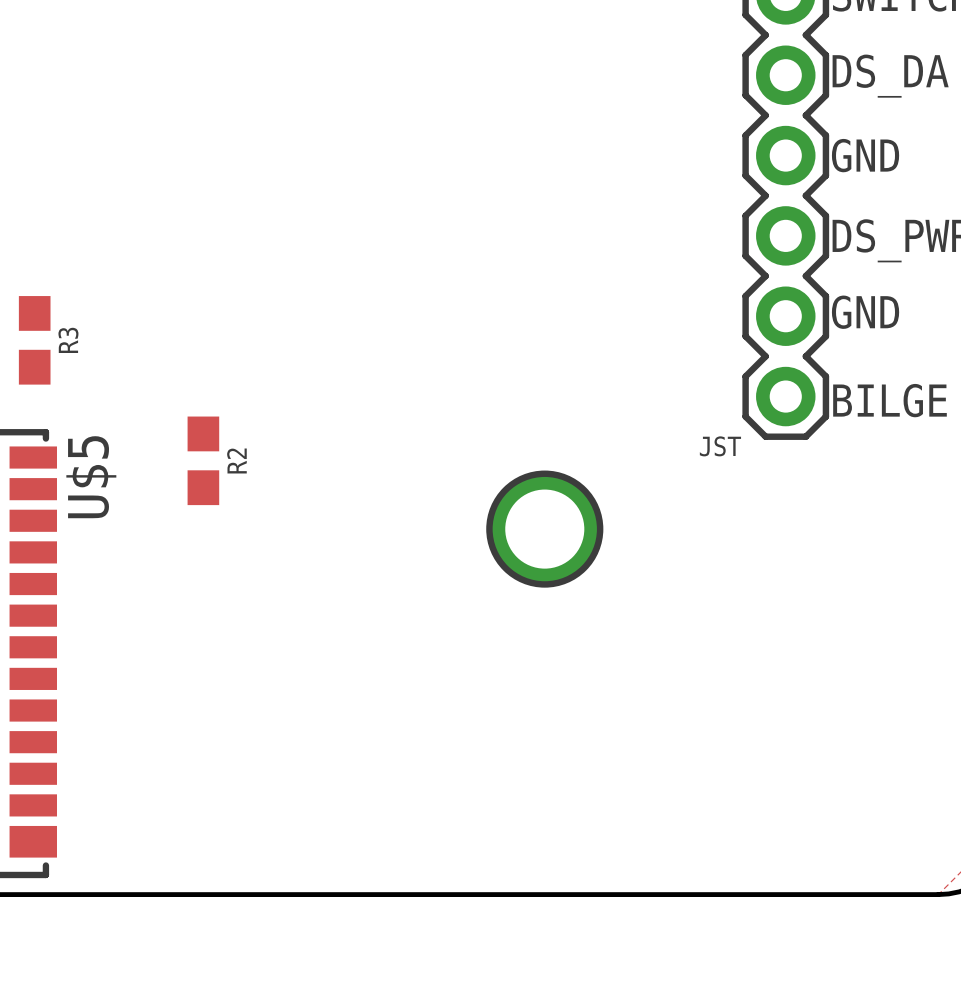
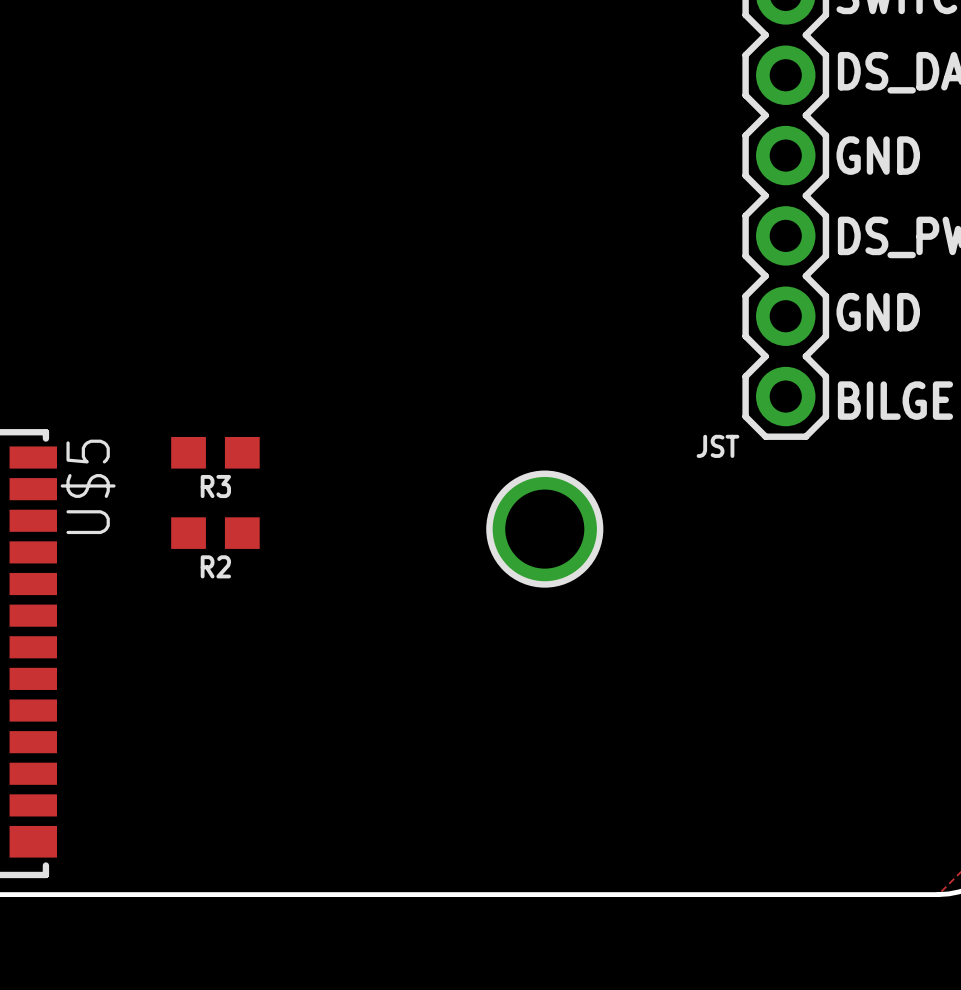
R3 rotation: 0° (34, 340) -> 90° clockwise (215, 452)
R3 position: (34, 340) -> (215, 452)
R2 rotation: 0° (203, 460) -> 90° clockwise (215, 533)
R2 position: (203, 460) -> (215, 533)

